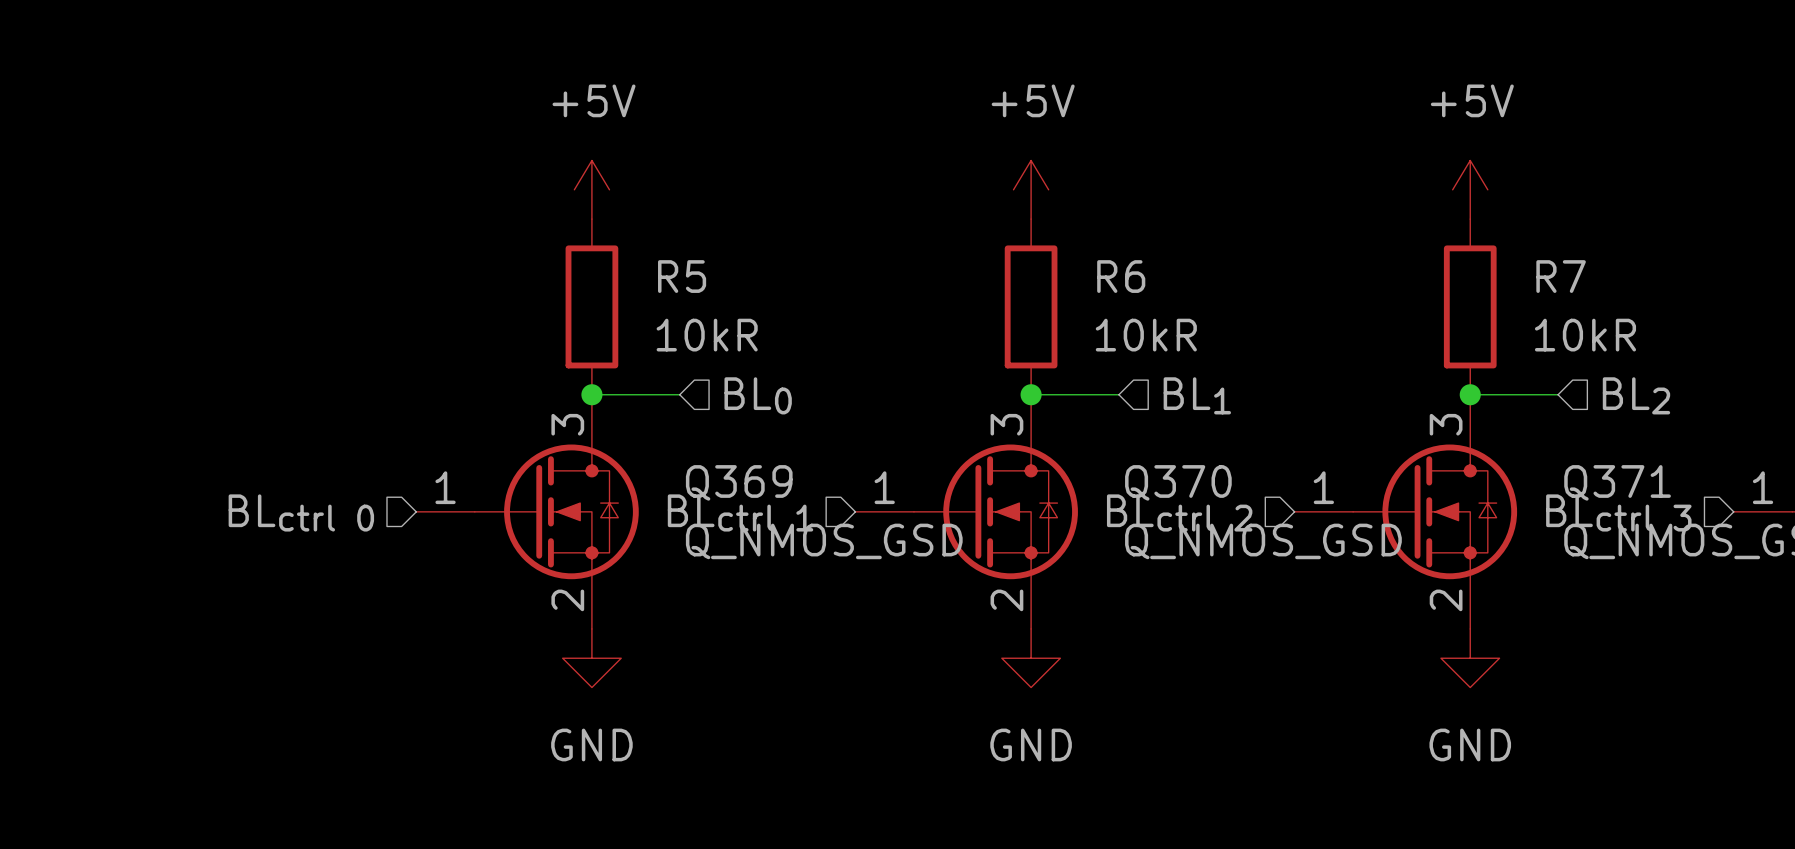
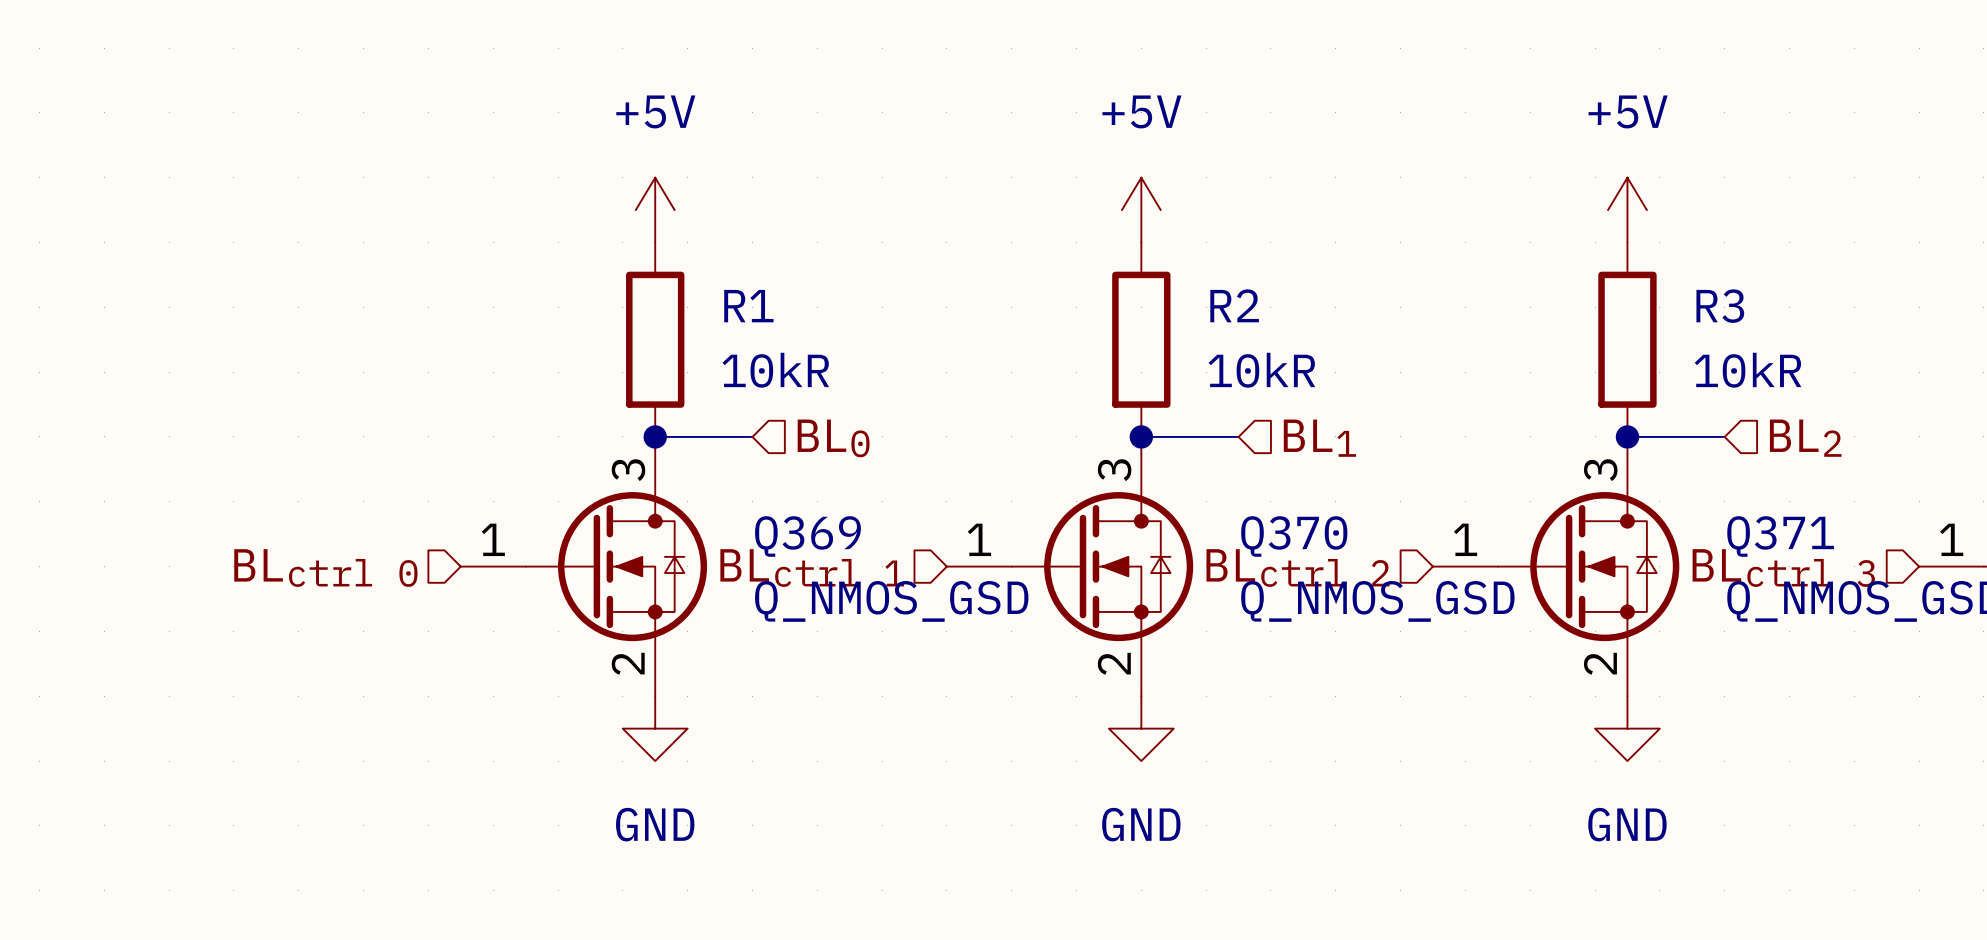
R5 name: R5 (682, 276) -> R1 (748, 306)
R6 name: R6 (1121, 276) -> R2 (1234, 305)
R7 name: R7 (1561, 276) -> R3 (1720, 306)

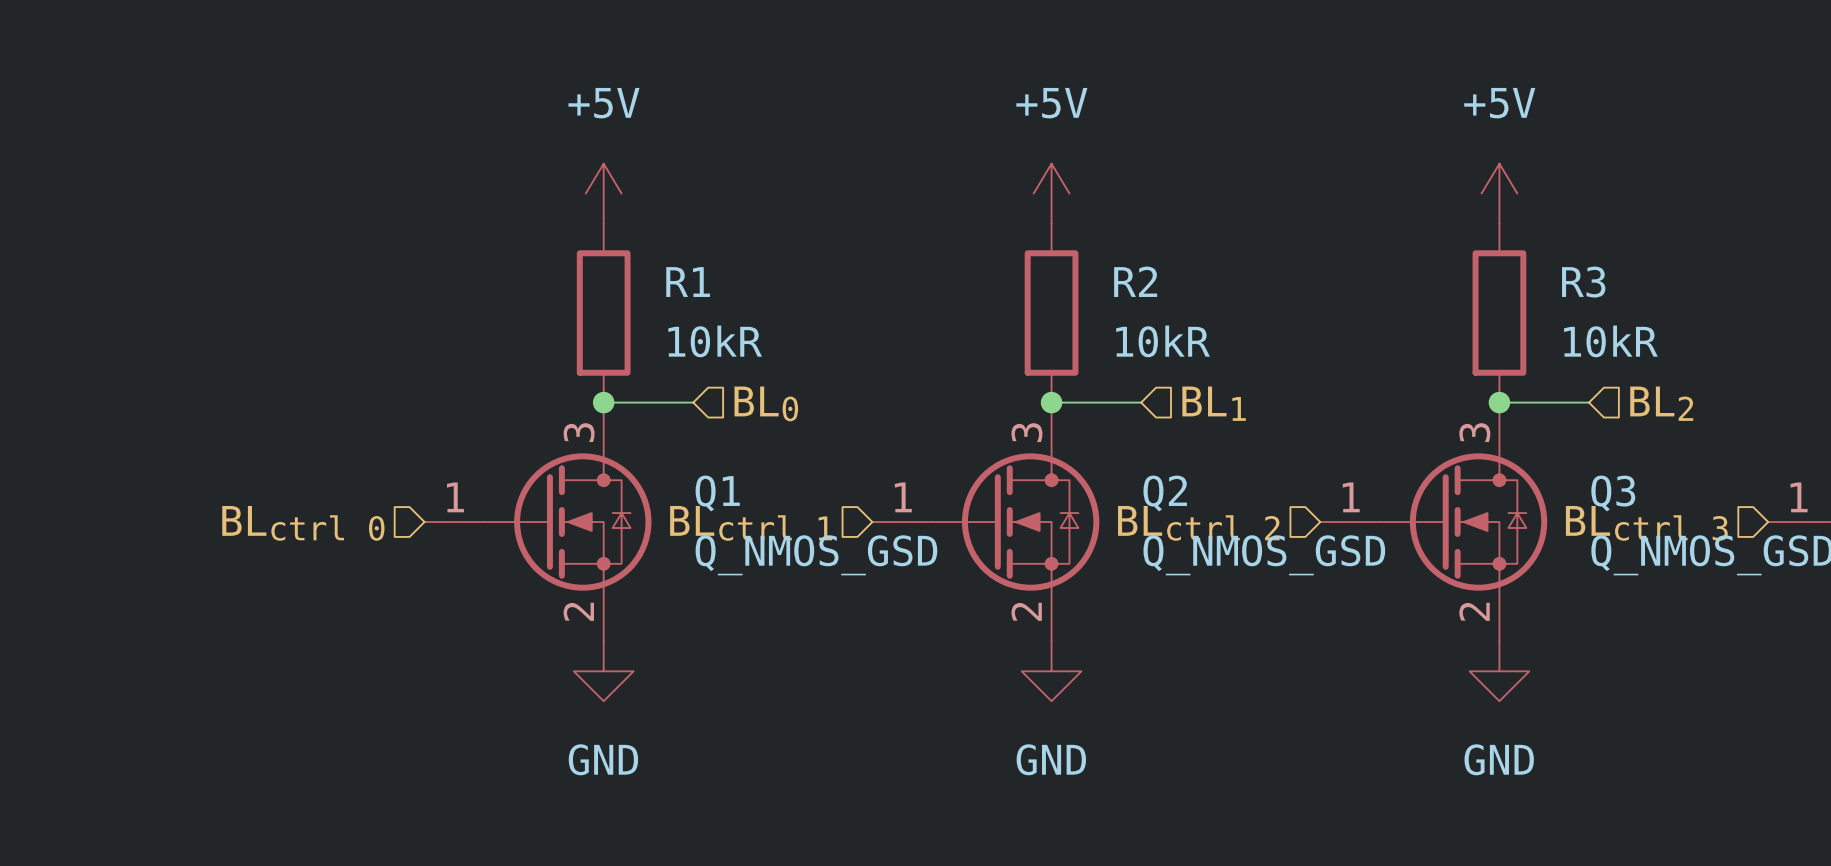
Q369 name: Q369 (807, 536) -> Q1 (717, 493)
Q370 name: Q370 (1294, 536) -> Q2 (1165, 493)
Q371 name: Q371 (1780, 536) -> Q3 (1613, 493)

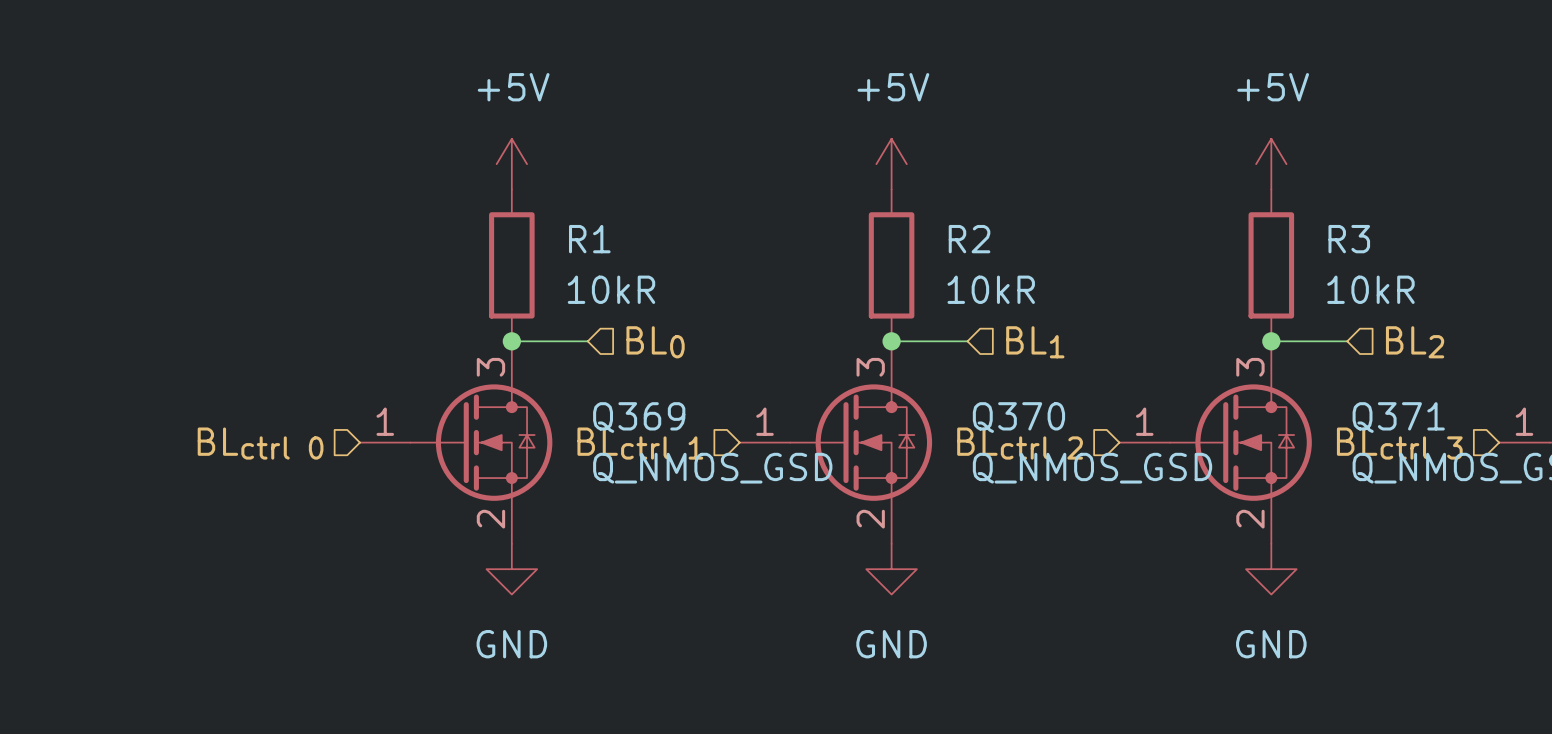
Q1 name: Q1 (717, 493) -> Q369 (639, 417)
Q2 name: Q2 (1165, 493) -> Q370 (1018, 417)
Q3 name: Q3 (1613, 493) -> Q371 (1398, 417)

